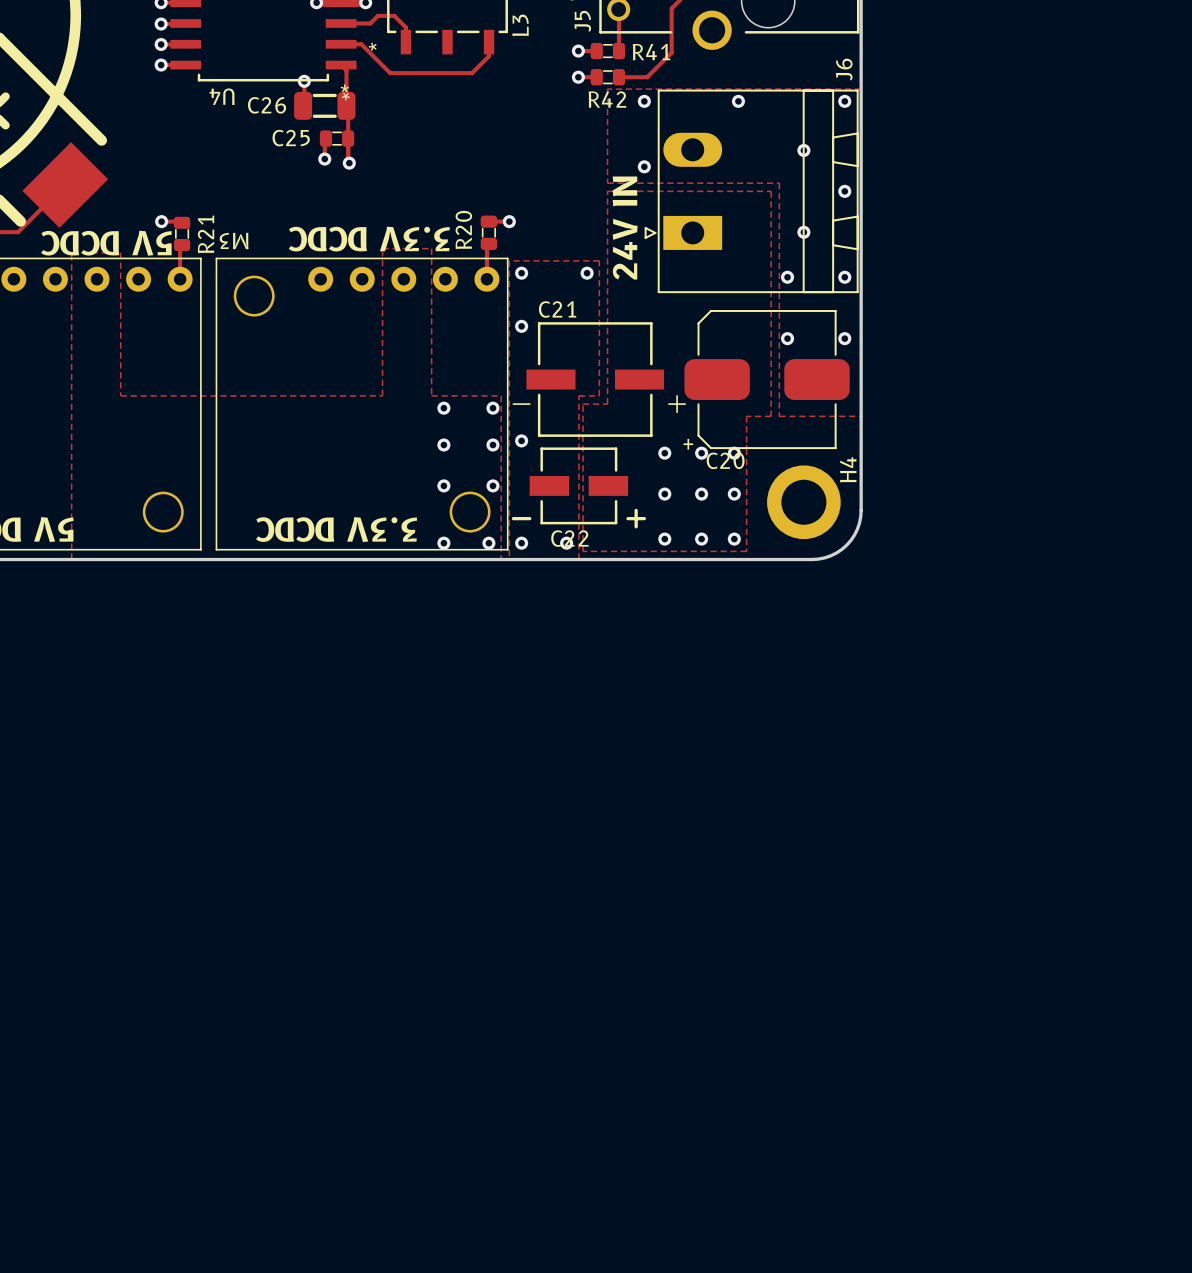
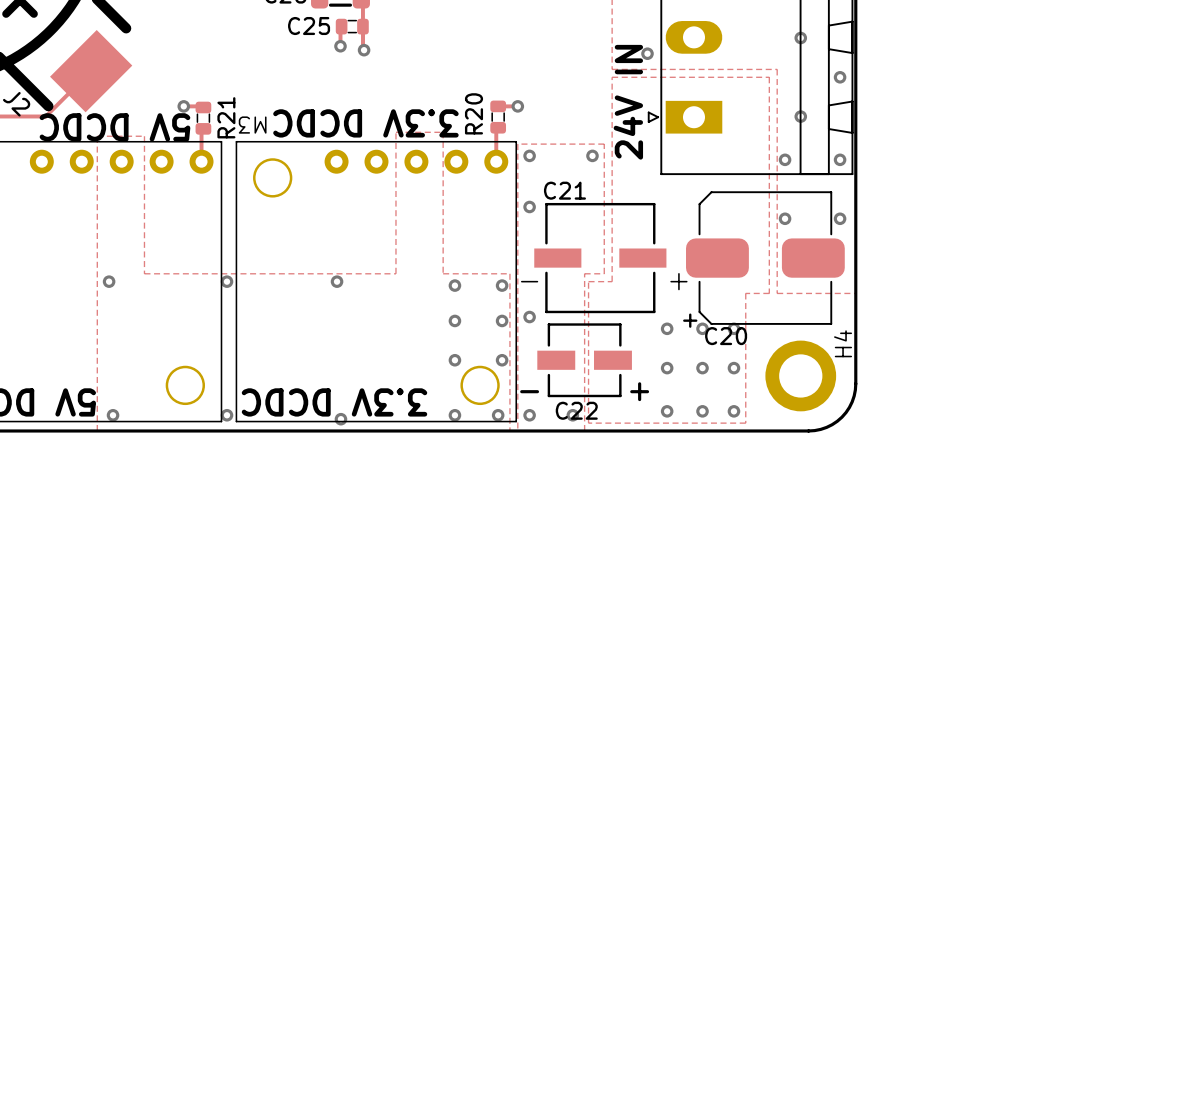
via: none -> (109, 281)
via: none -> (226, 281)
via: none -> (337, 281)
via: none -> (113, 415)
via: none -> (226, 415)
via: none -> (340, 419)

